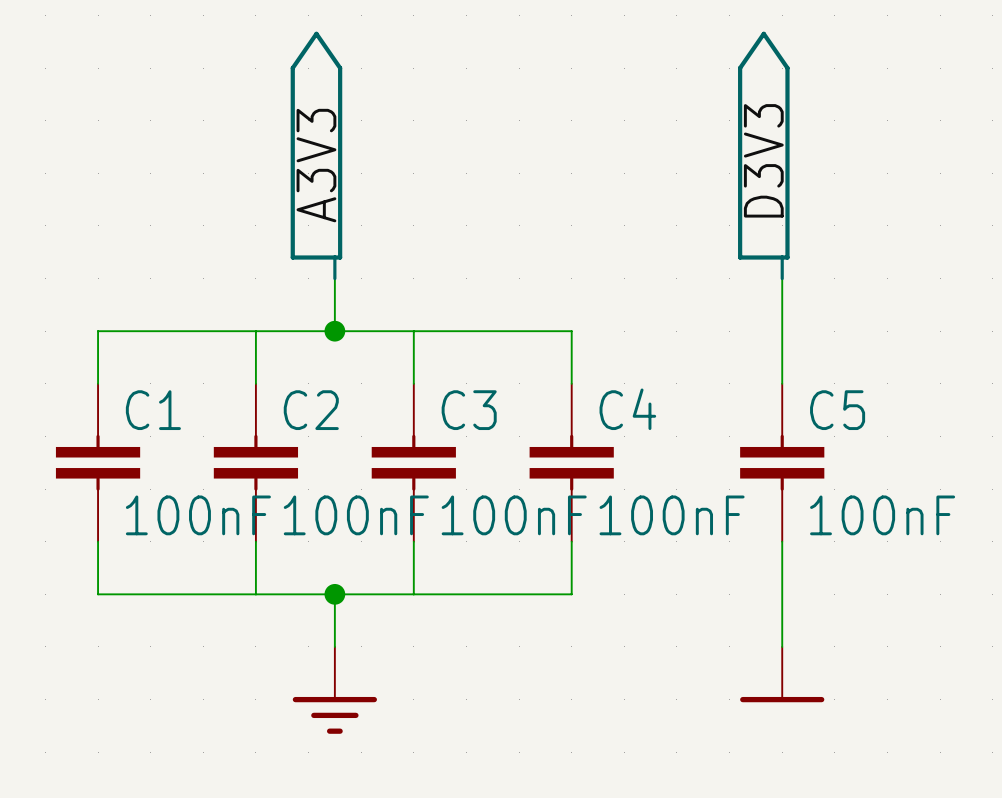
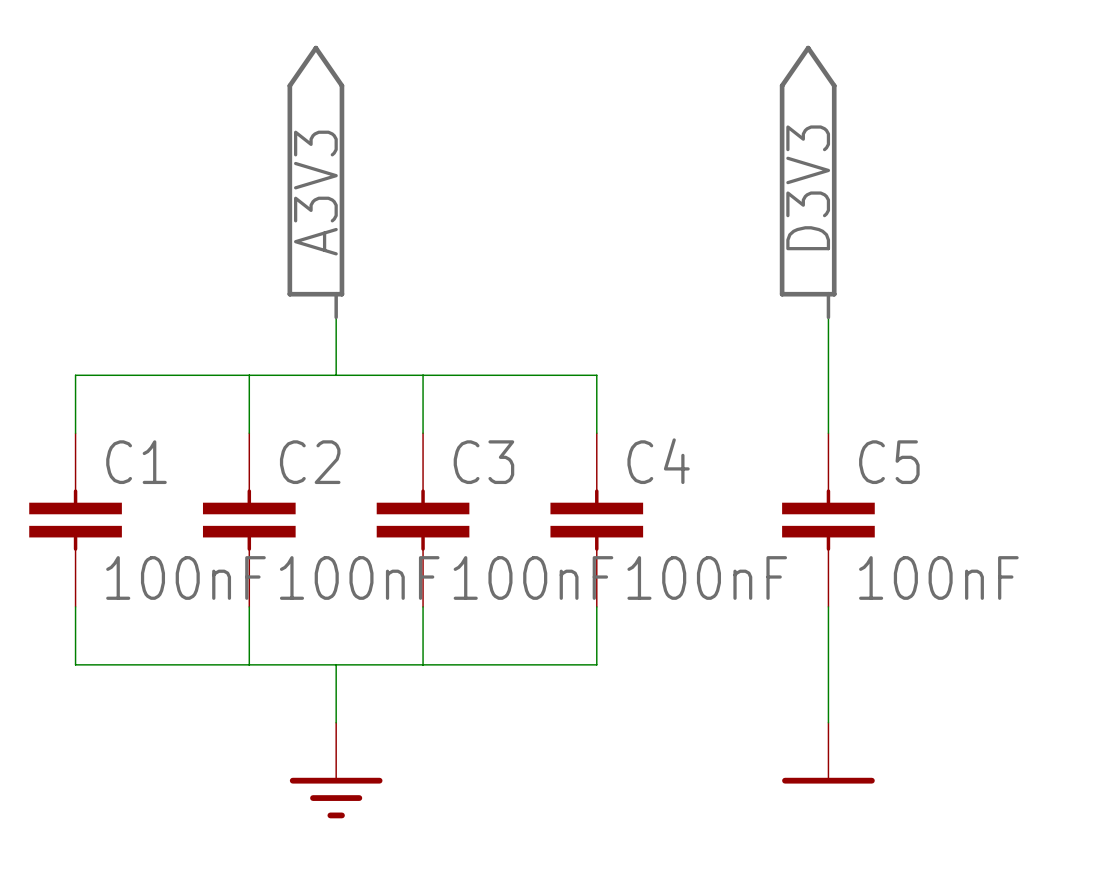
junction: (334, 331) -> none
junction: (334, 594) -> none

